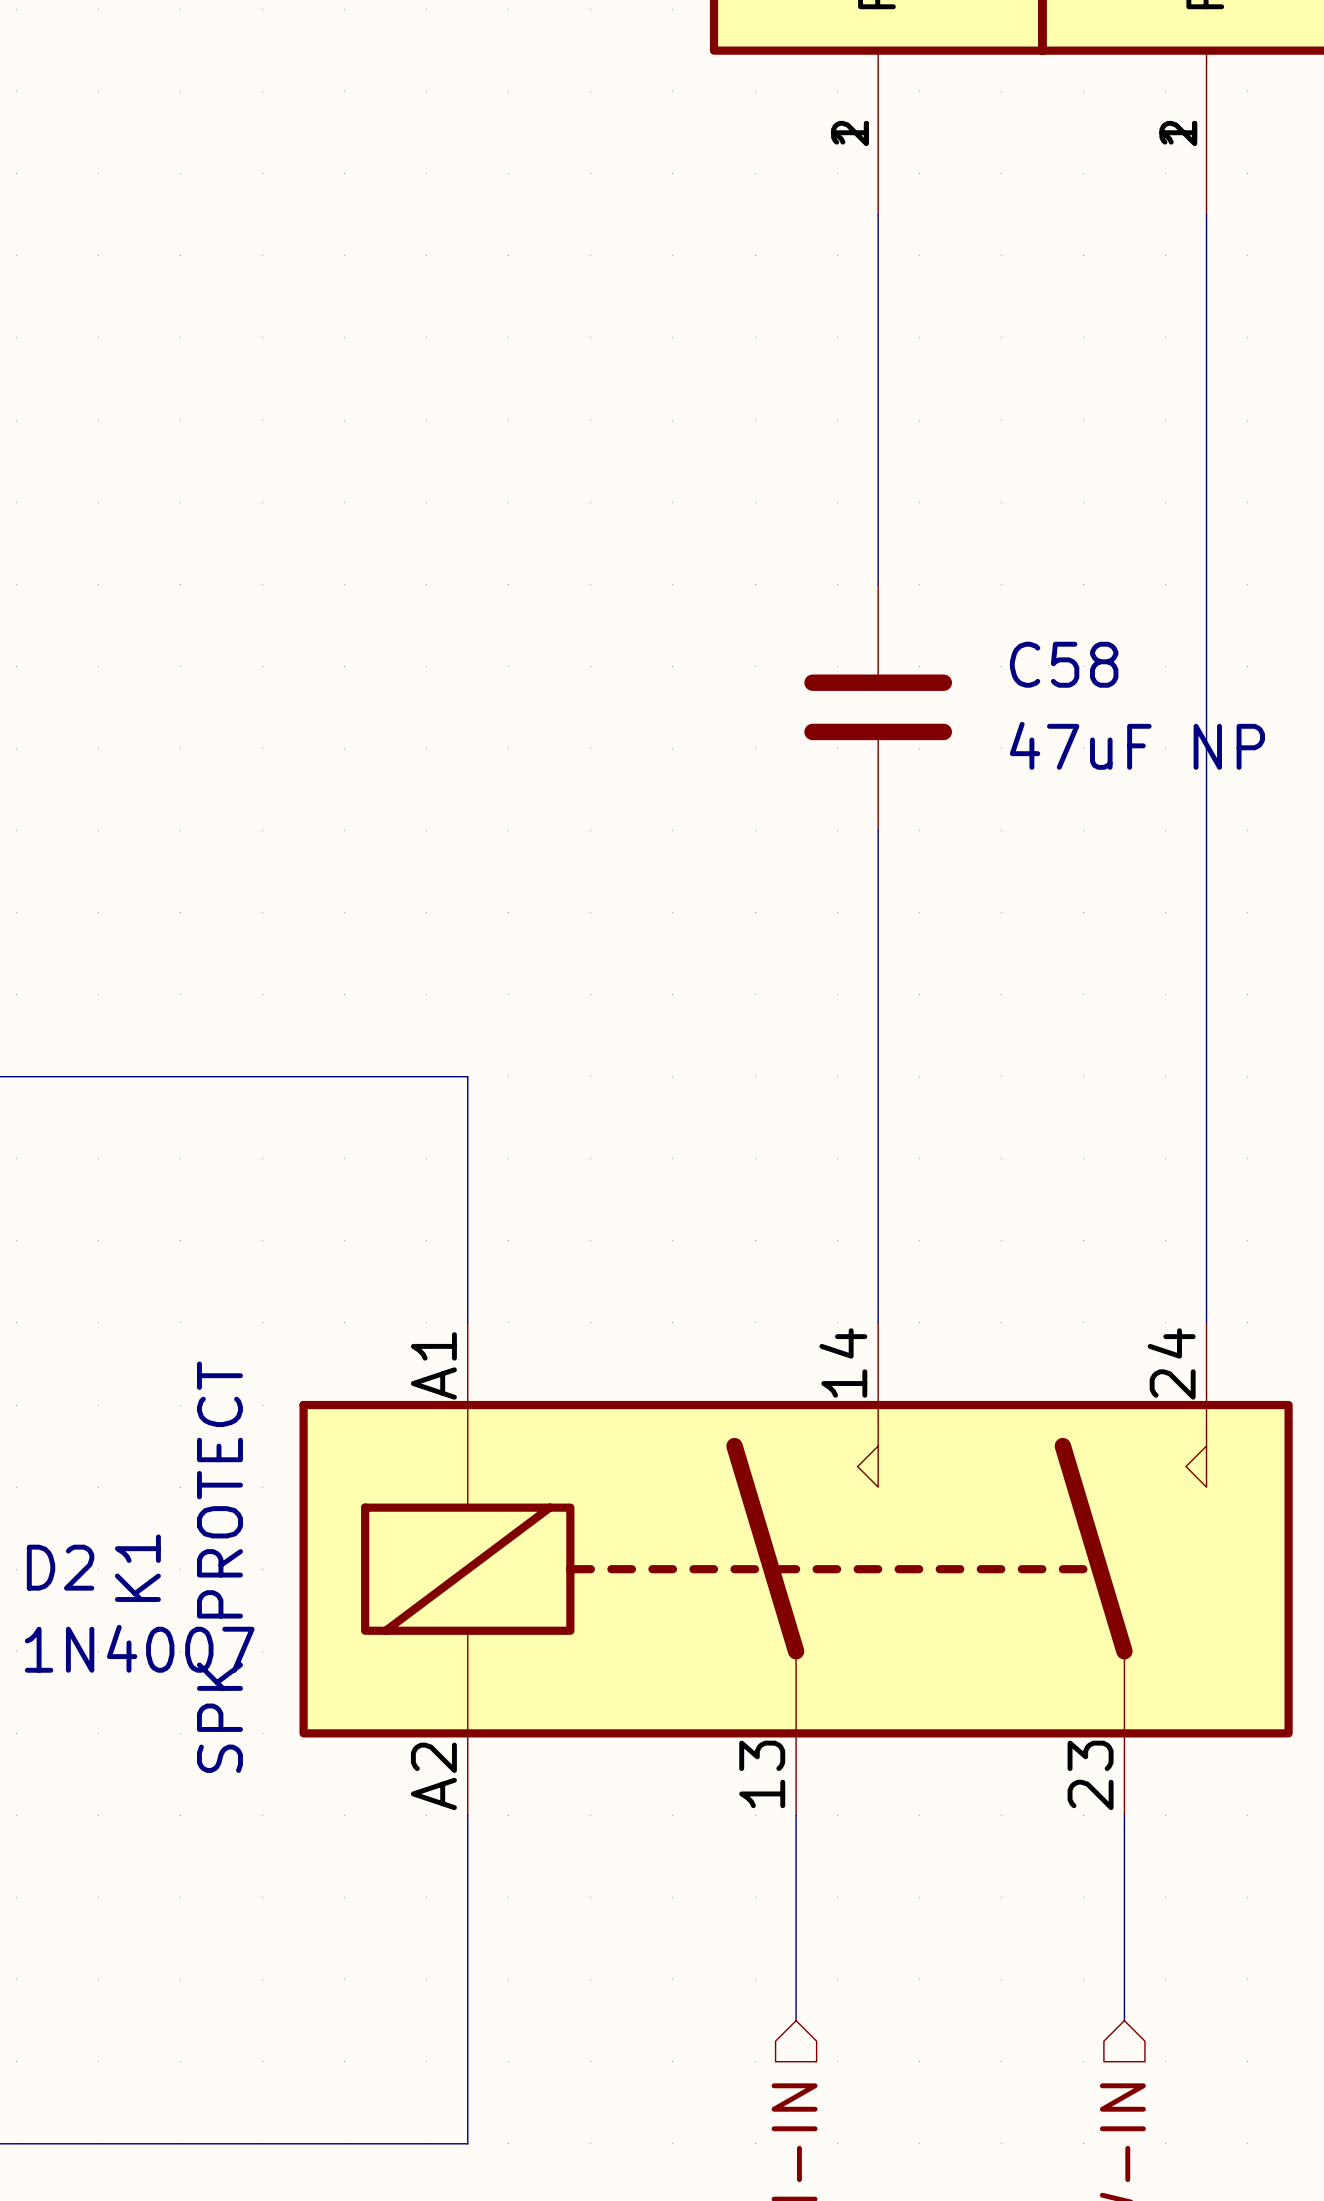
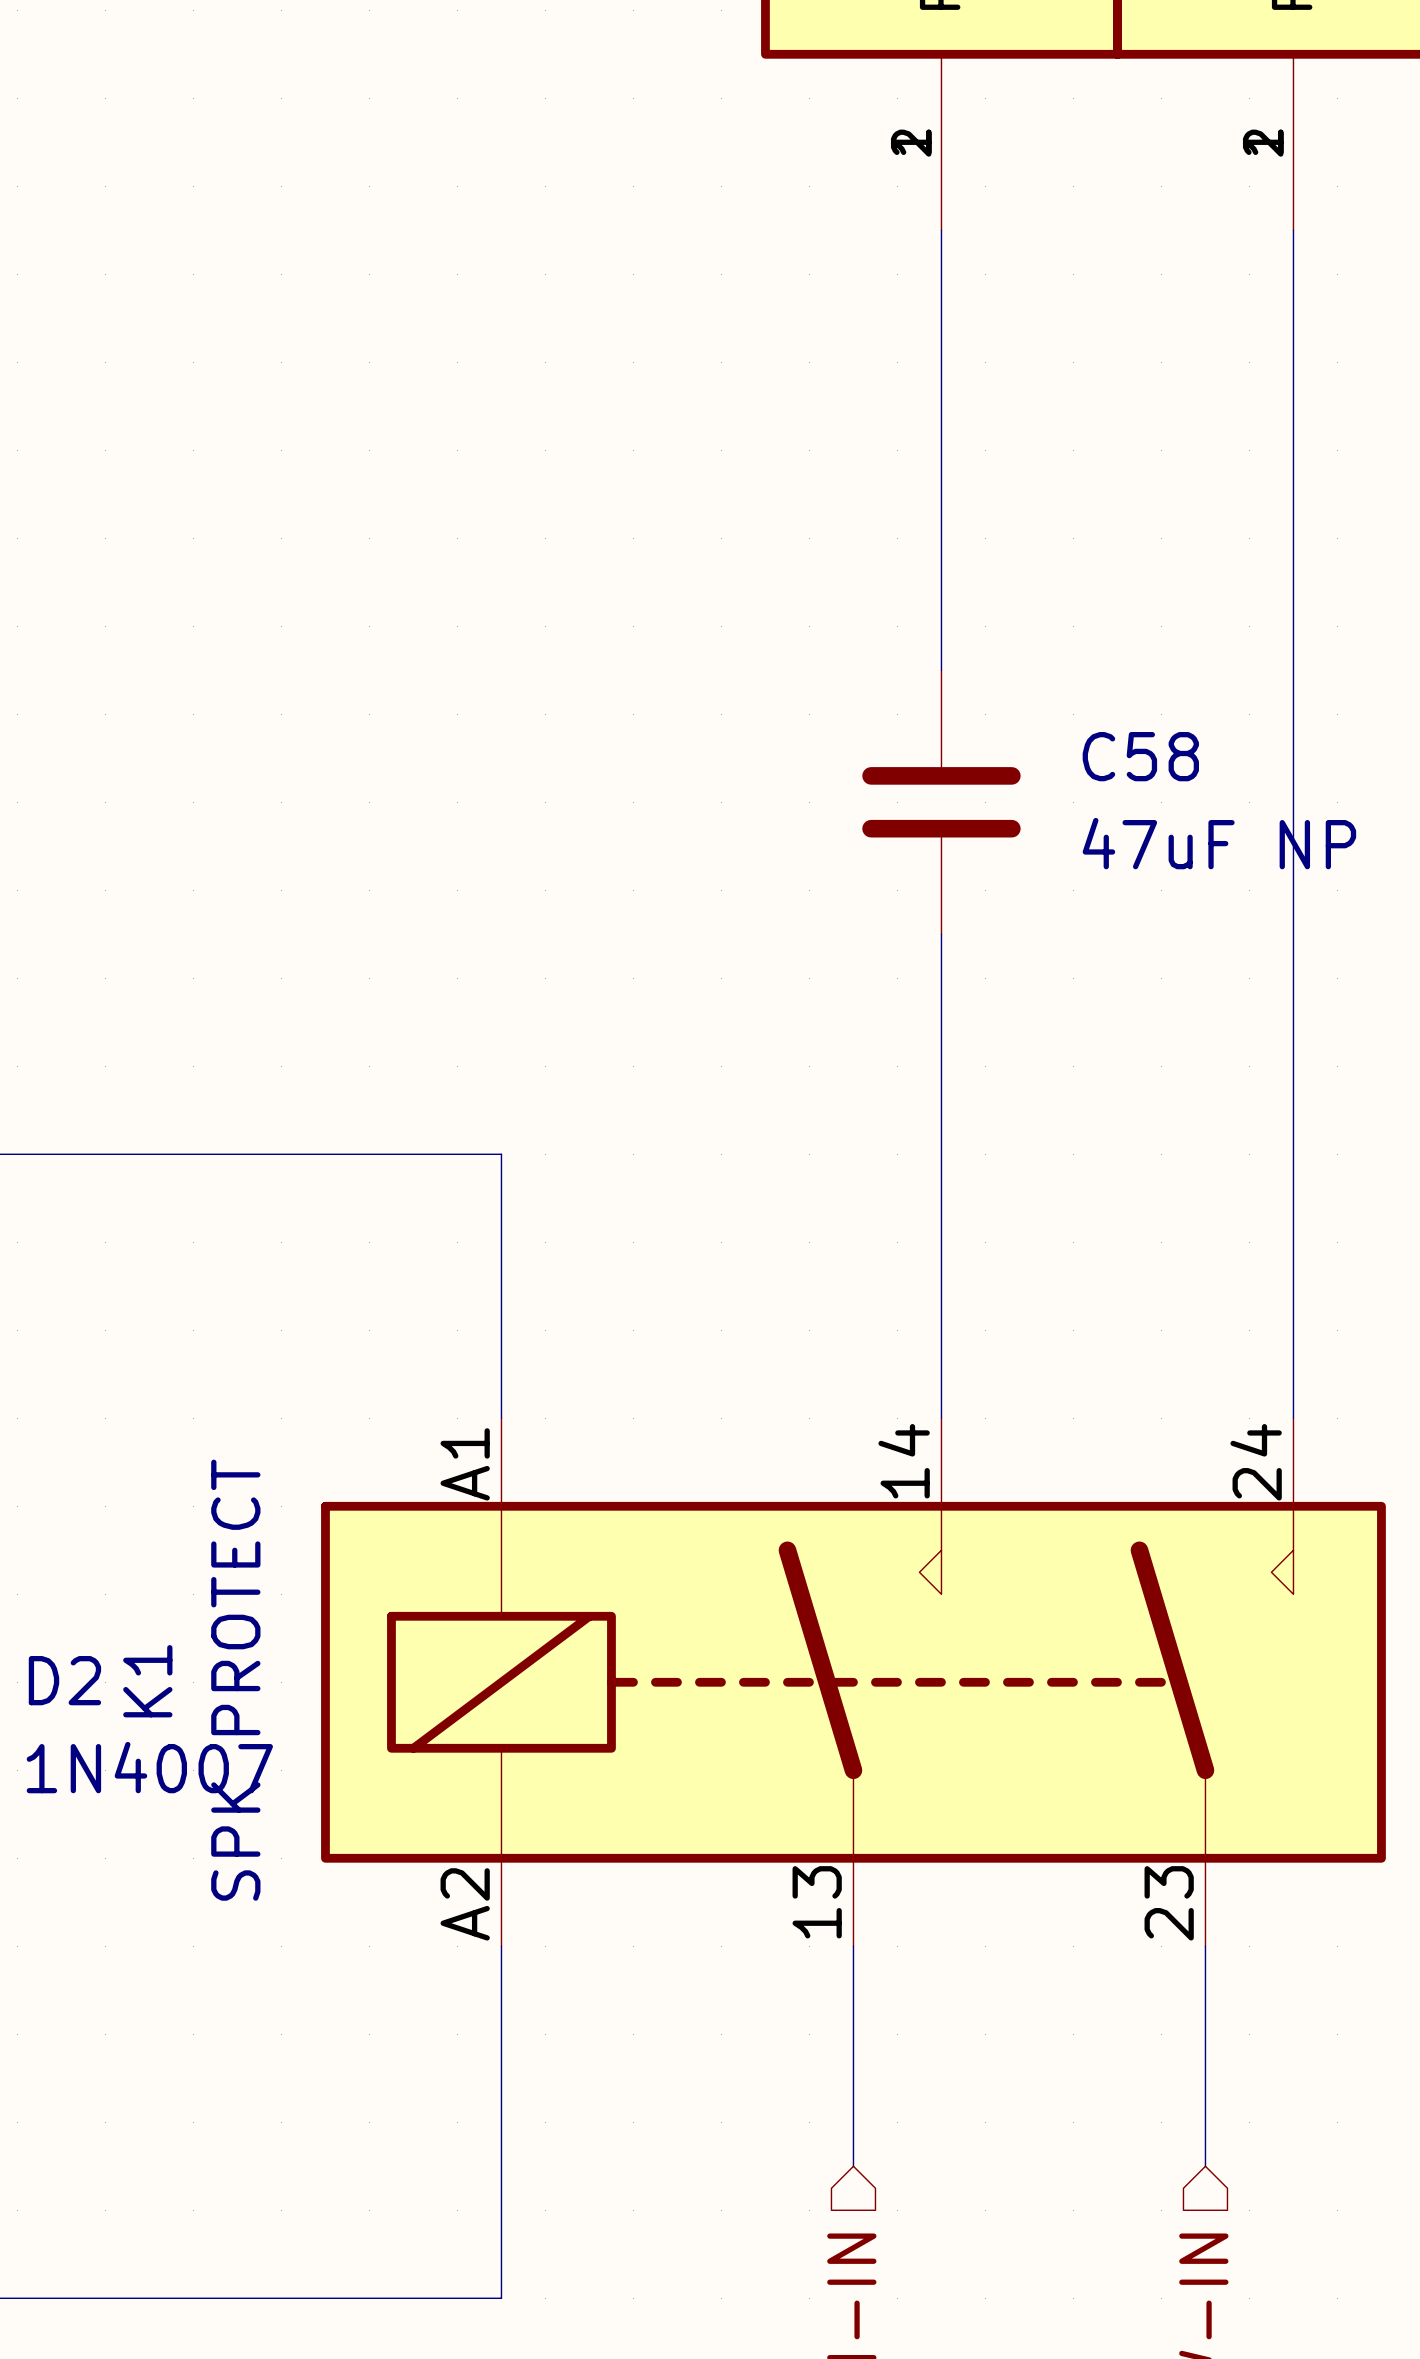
C58 position: (878, 707) -> (941, 802)

